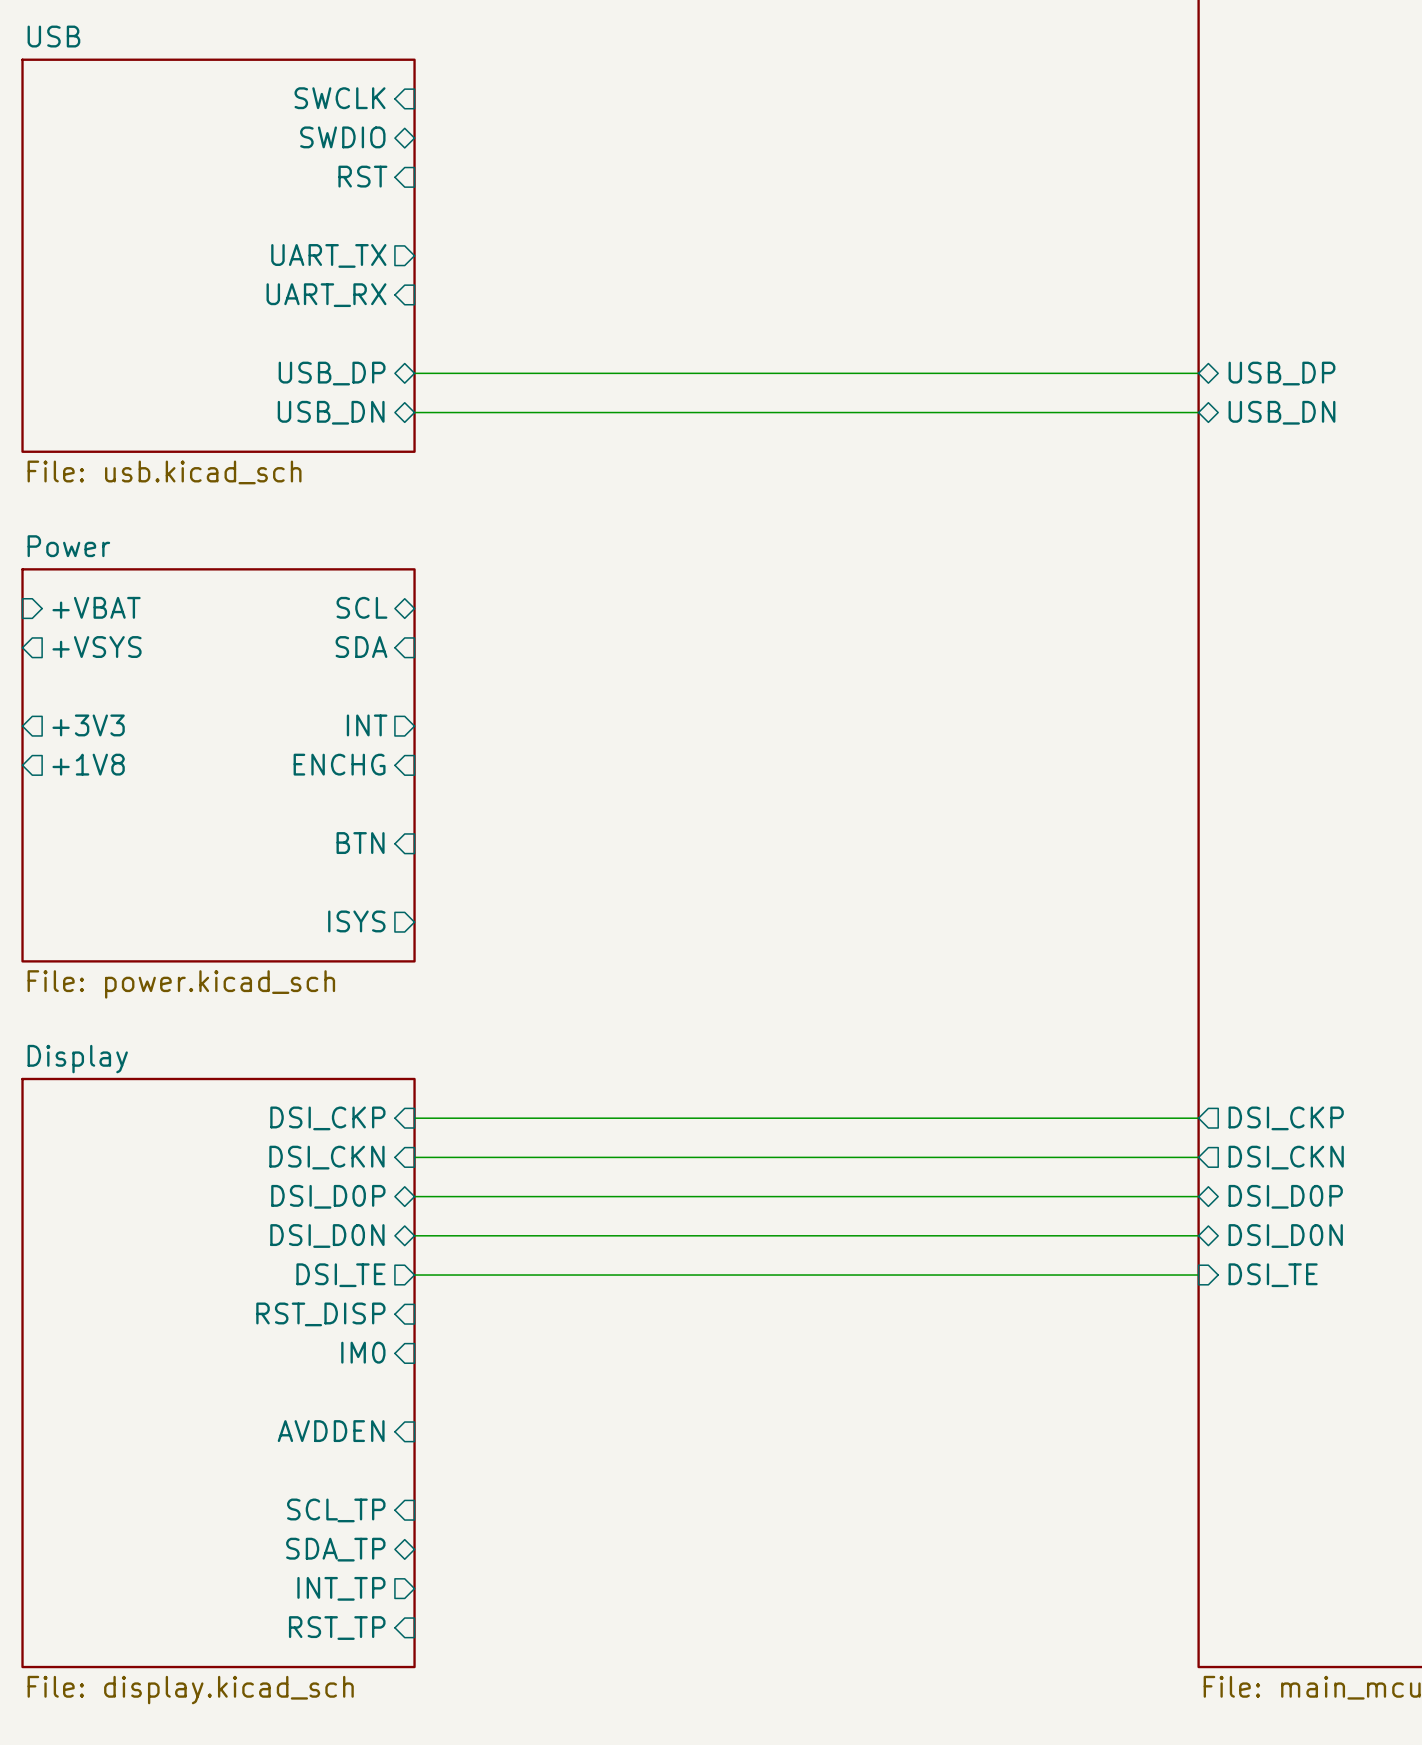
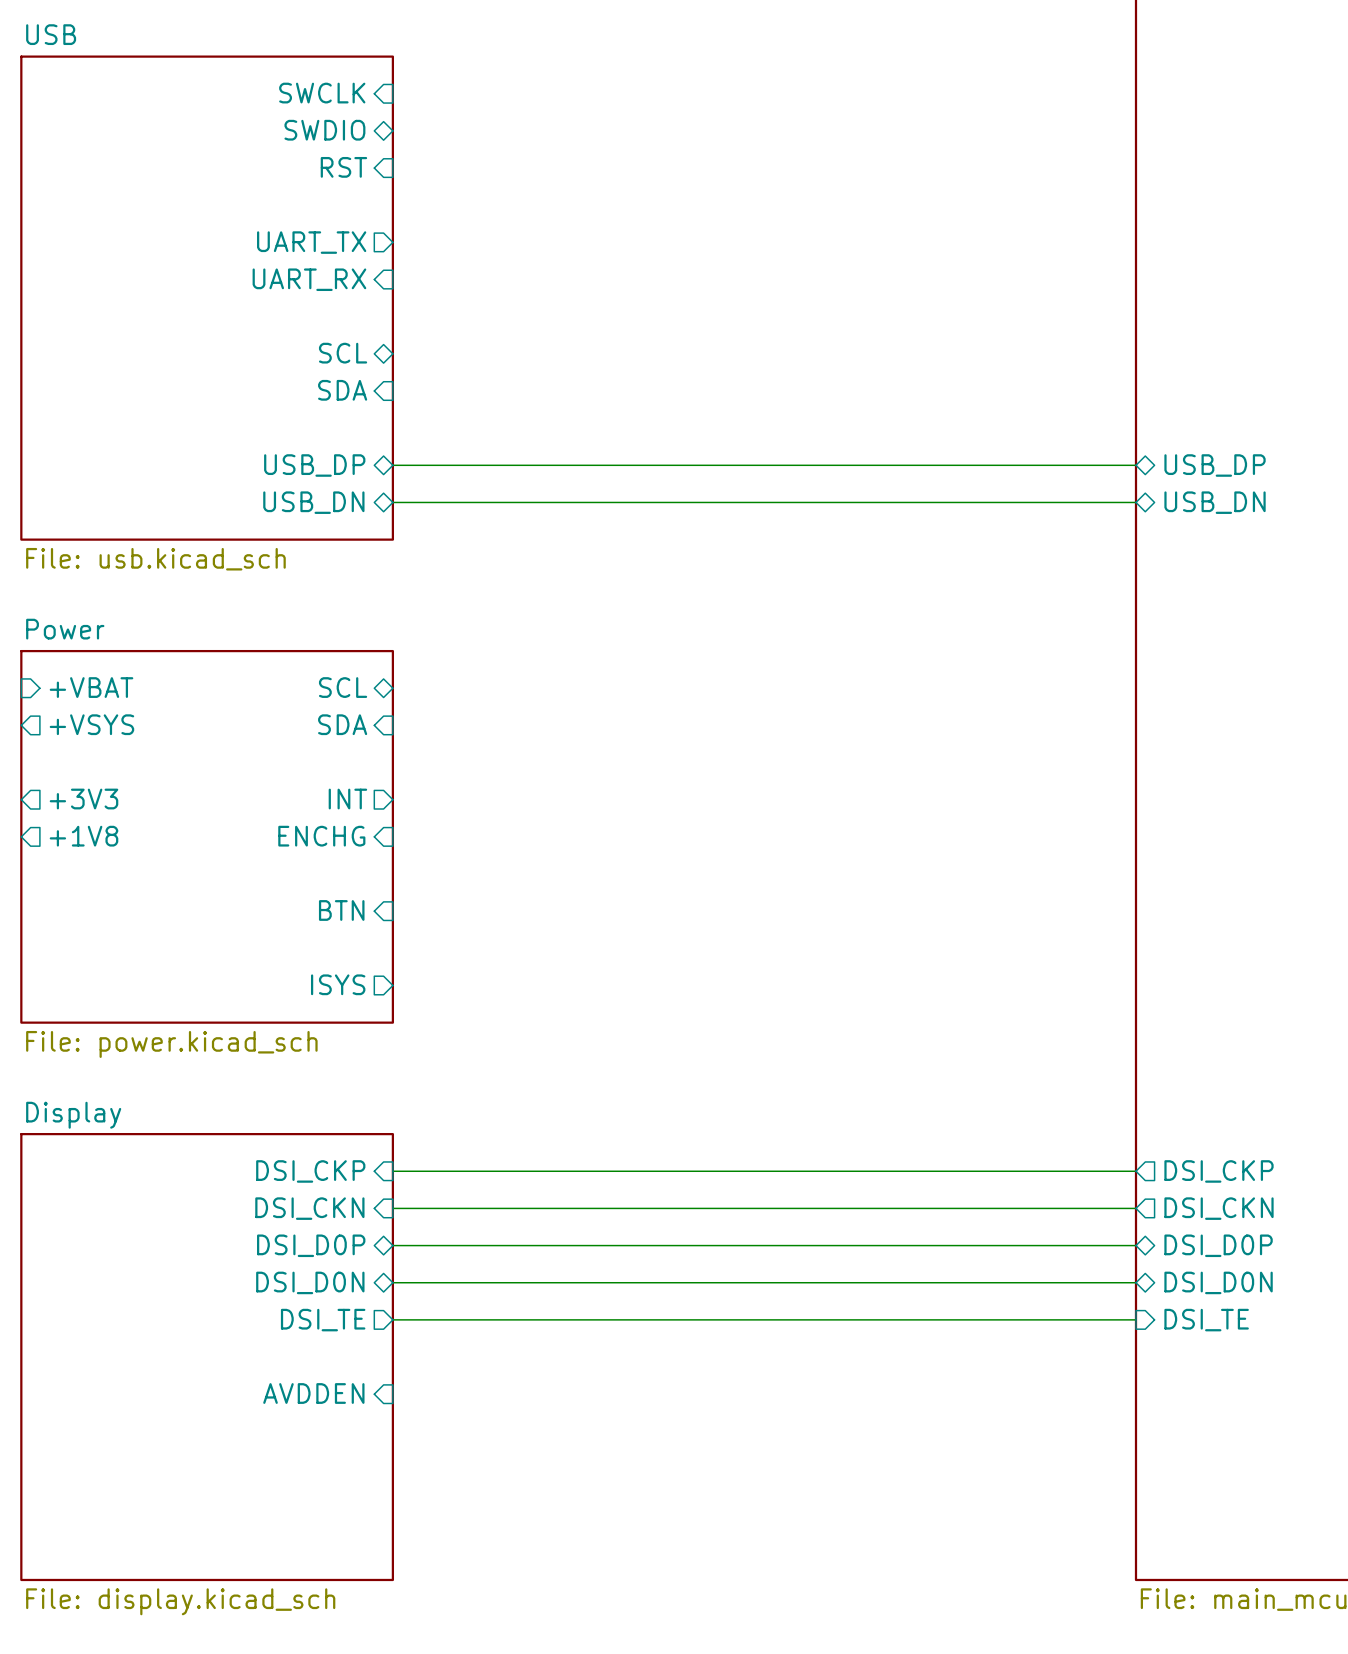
sheet USB: File: usb.kicad_sch (218, 255) -> none
sheet USB: none -> File: usb.kicad_sch (207, 298)
sheet pin: USB_DP (332, 373) -> SCL (343, 353)
wire: (414, 373) (1198, 373) -> (392, 465) (1135, 465)
sheet pin position: USB_DP (1281, 373) -> USB_DP (1215, 465)
sheet pin shape: bidirectional (331, 412) -> input (342, 390)
sheet pin: USB_DN (331, 412) -> SDA (342, 390)
wire: (414, 412) (1198, 412) -> (392, 502) (1135, 502)
sheet pin position: USB_DN (1281, 412) -> USB_DN (1215, 502)
sheet pin: none -> USB_DP (314, 465)
sheet pin: none -> USB_DN (313, 502)
sheet pin: +VBAT (96, 607) -> none
sheet pin: SCL (361, 607) -> none
sheet pin: +VSYS (97, 647) -> none
sheet pin: SDA (361, 647) -> none
sheet pin shape: output (88, 725) -> input (91, 687)
sheet pin: +3V3 (88, 725) -> +VBAT (91, 687)
sheet pin shape: output (367, 725) -> bidirectional (343, 687)
sheet pin: INT (367, 725) -> SCL (343, 687)
sheet pin: +1V8 (88, 764) -> +VSYS (91, 724)
sheet pin: ENCHG (339, 764) -> SDA (342, 724)
sheet Power position: (218, 765) -> (207, 836)
sheet pin: none -> +3V3 (83, 799)
sheet pin shape: input (360, 843) -> output (347, 799)
sheet pin: BTN (360, 843) -> INT (347, 799)
sheet pin: none -> +1V8 (83, 836)
sheet pin: none -> ENCHG (321, 836)
sheet pin position: ISYS (356, 921) -> ISYS (338, 984)
sheet pin: none -> BTN (341, 910)
sheet pin: DSI_CKP (327, 1118) -> none
wire: (414, 1118) (1198, 1118) -> (392, 1319) (1135, 1319)
sheet pin: DSI_CKP (1286, 1118) -> none
sheet pin: DSI_CKN (326, 1157) -> none
wire: (414, 1157) (1198, 1157) -> (392, 1282) (1135, 1282)
sheet pin: DSI_CKN (1286, 1157) -> none
sheet pin: DSI_D0P (328, 1196) -> none
wire: (414, 1196) (1198, 1196) -> (392, 1245) (1135, 1245)
sheet pin position: DSI_D0P (1285, 1196) -> DSI_D0P (1218, 1245)
sheet pin shape: bidirectional (327, 1236) -> input (310, 1171)
sheet pin: DSI_D0N (327, 1236) -> DSI_CKP (310, 1171)
sheet pin shape: bidirectional (1285, 1236) -> output (1219, 1171)
sheet pin: DSI_D0N (1285, 1236) -> DSI_CKP (1219, 1171)
sheet pin shape: output (340, 1275) -> input (309, 1208)
sheet pin: DSI_TE (340, 1275) -> DSI_CKN (309, 1208)
sheet pin shape: input (1273, 1275) -> output (1219, 1208)
sheet pin: DSI_TE (1273, 1275) -> DSI_CKN (1219, 1208)
sheet pin shape: input (320, 1314) -> bidirectional (311, 1245)
sheet pin: RST_DISP (320, 1314) -> DSI_D0P (311, 1245)
sheet pin shape: input (363, 1352) -> bidirectional (310, 1282)
sheet pin: IM0 (363, 1352) -> DSI_D0N (310, 1282)
sheet pin: none -> DSI_D0N (1218, 1282)
sheet Display: File: display.kicad_sch (218, 1373) -> none
sheet pin: none -> DSI_TE (323, 1320)
sheet pin: none -> DSI_TE (1206, 1320)
sheet Display: none -> File: display.kicad_sch (207, 1357)
sheet pin position: AVDDEN (331, 1431) -> AVDDEN (313, 1393)
sheet pin: SCL_TP (336, 1510) -> none
sheet pin: SDA_TP (335, 1549) -> none
sheet pin: INT_TP (341, 1588) -> none
sheet pin: RST_TP (337, 1628) -> none

